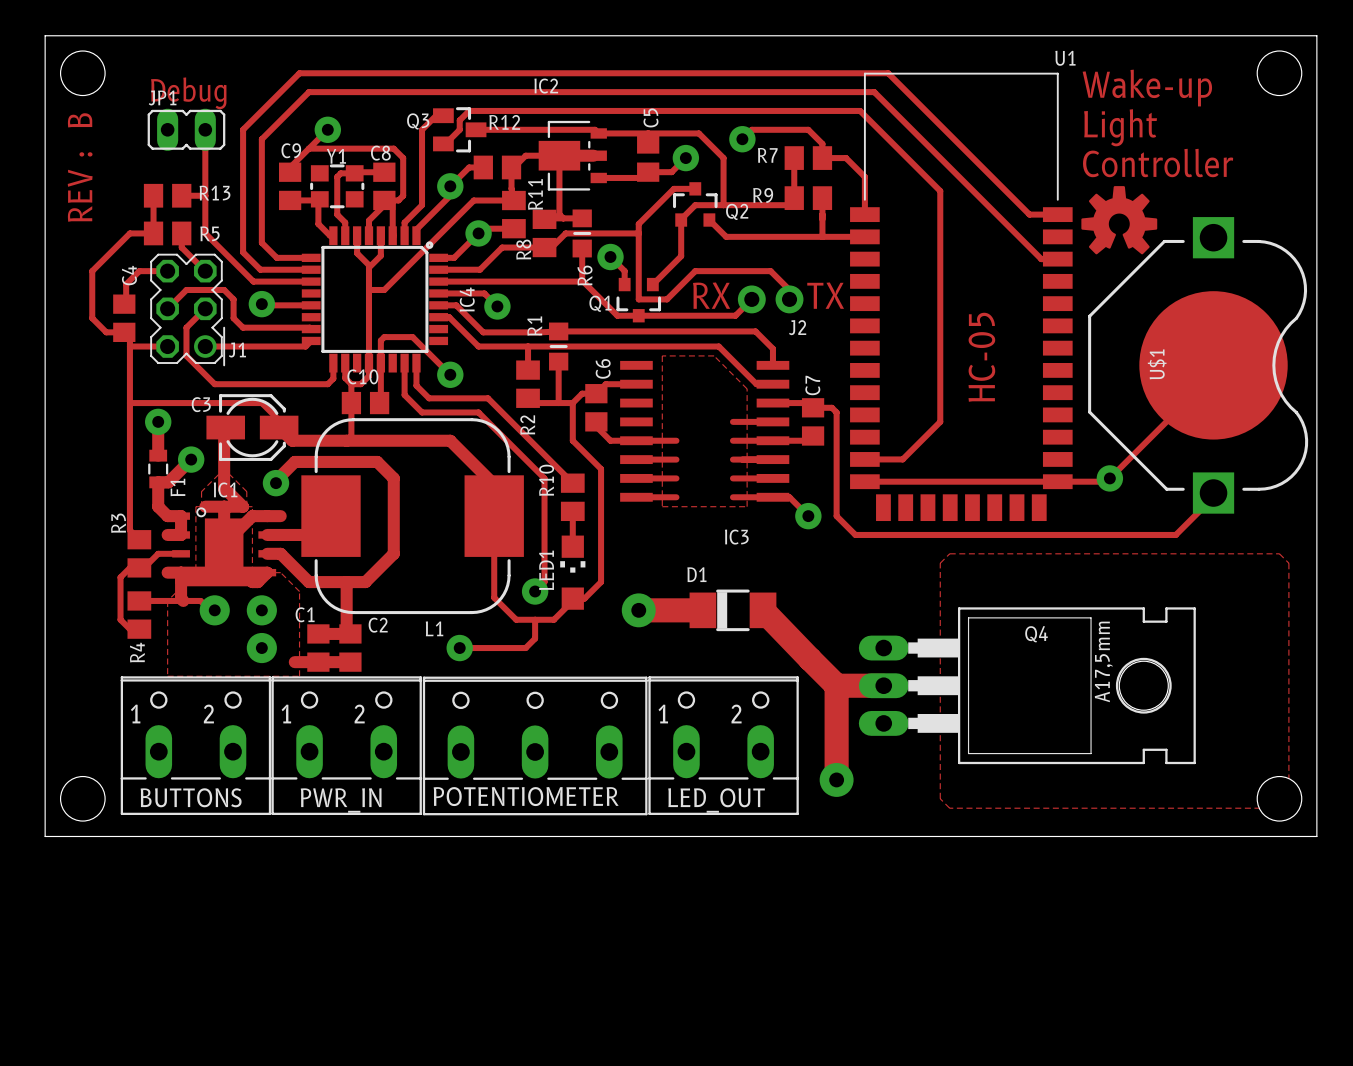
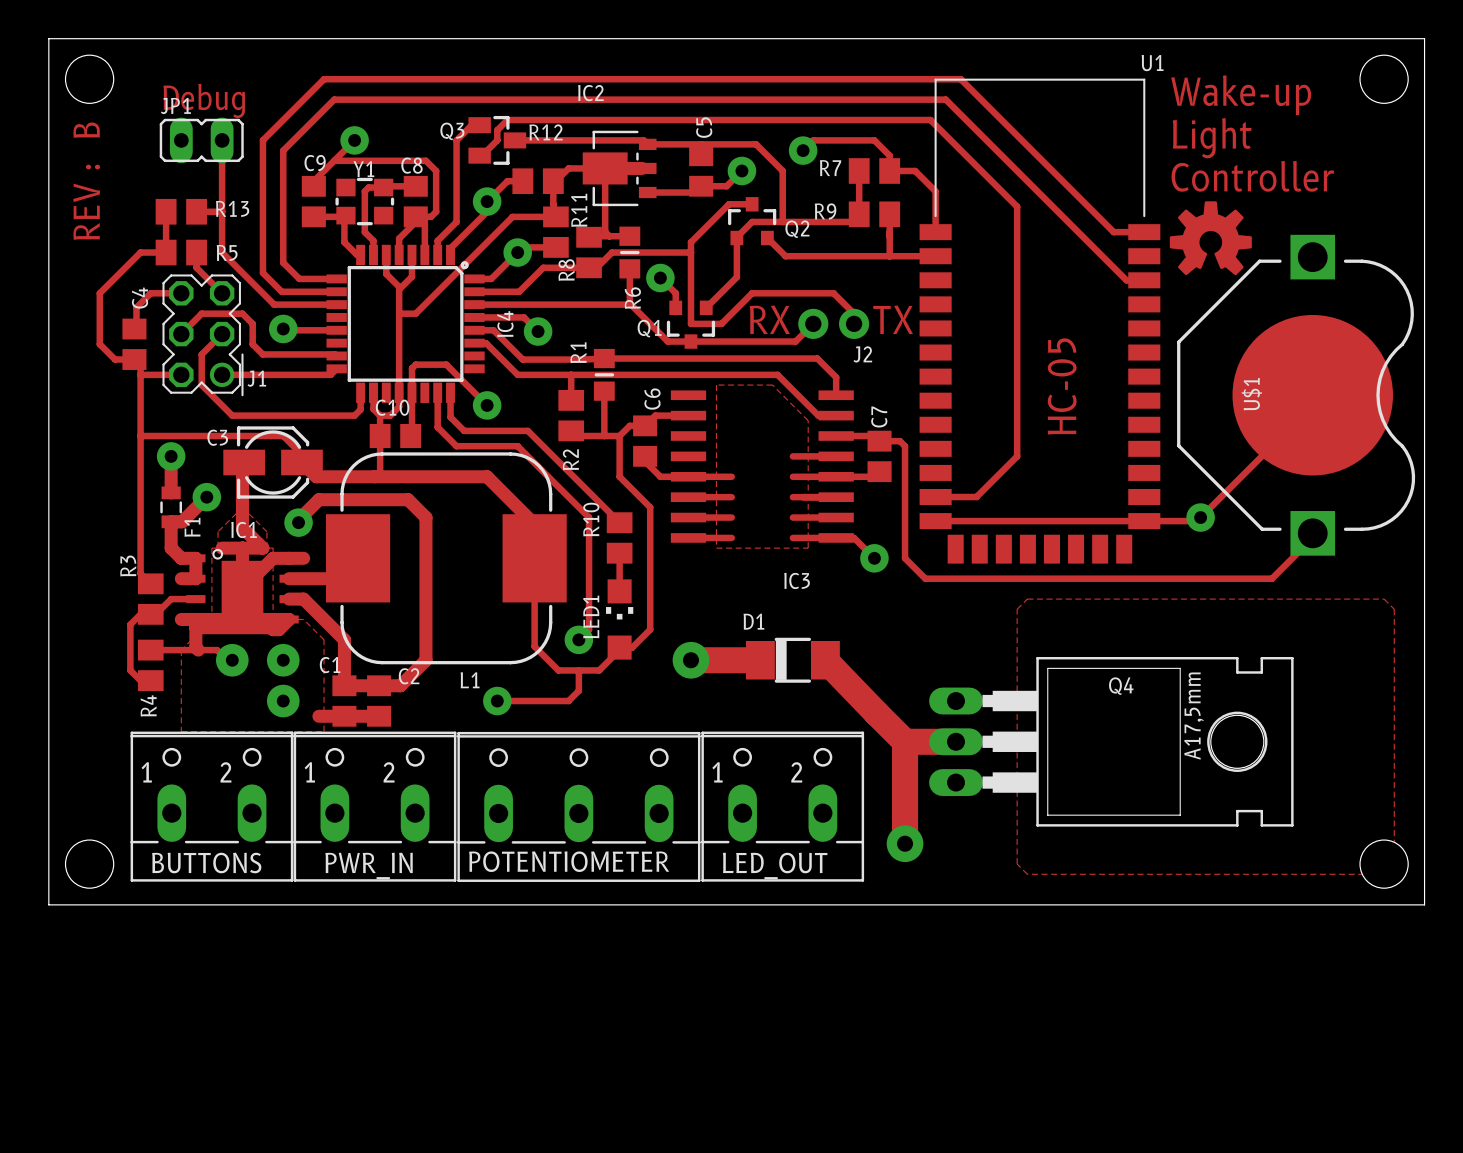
track: (393, 553) (365, 582) (308, 582) -> (425, 599) (425, 660) (400, 685) (379, 685)
track: none -> (334, 629) (344, 639) (344, 685)
track: (346, 582) (346, 633) -> none

